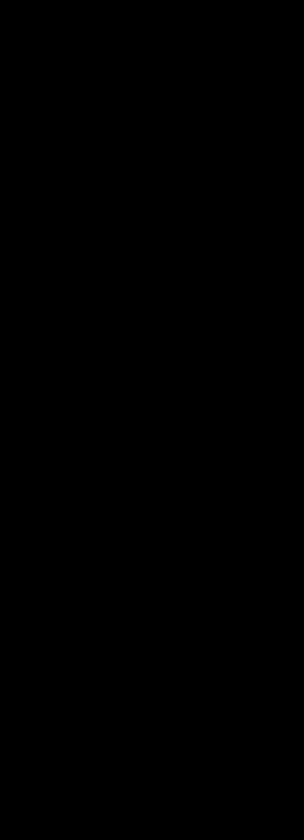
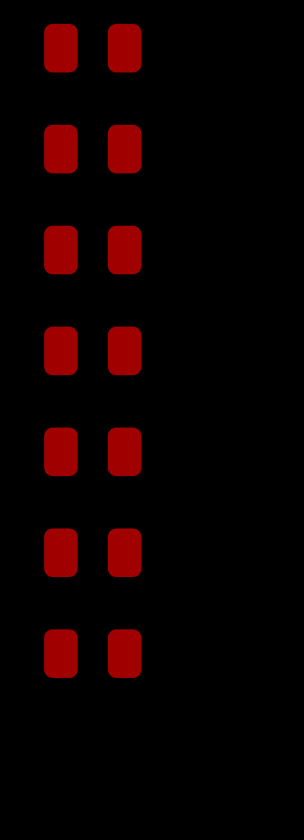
part: none -> (92, 48)
part: none -> (92, 149)
part: none -> (92, 250)
part: none -> (92, 350)
part: none -> (92, 451)
part: none -> (92, 552)
part: none -> (92, 653)

